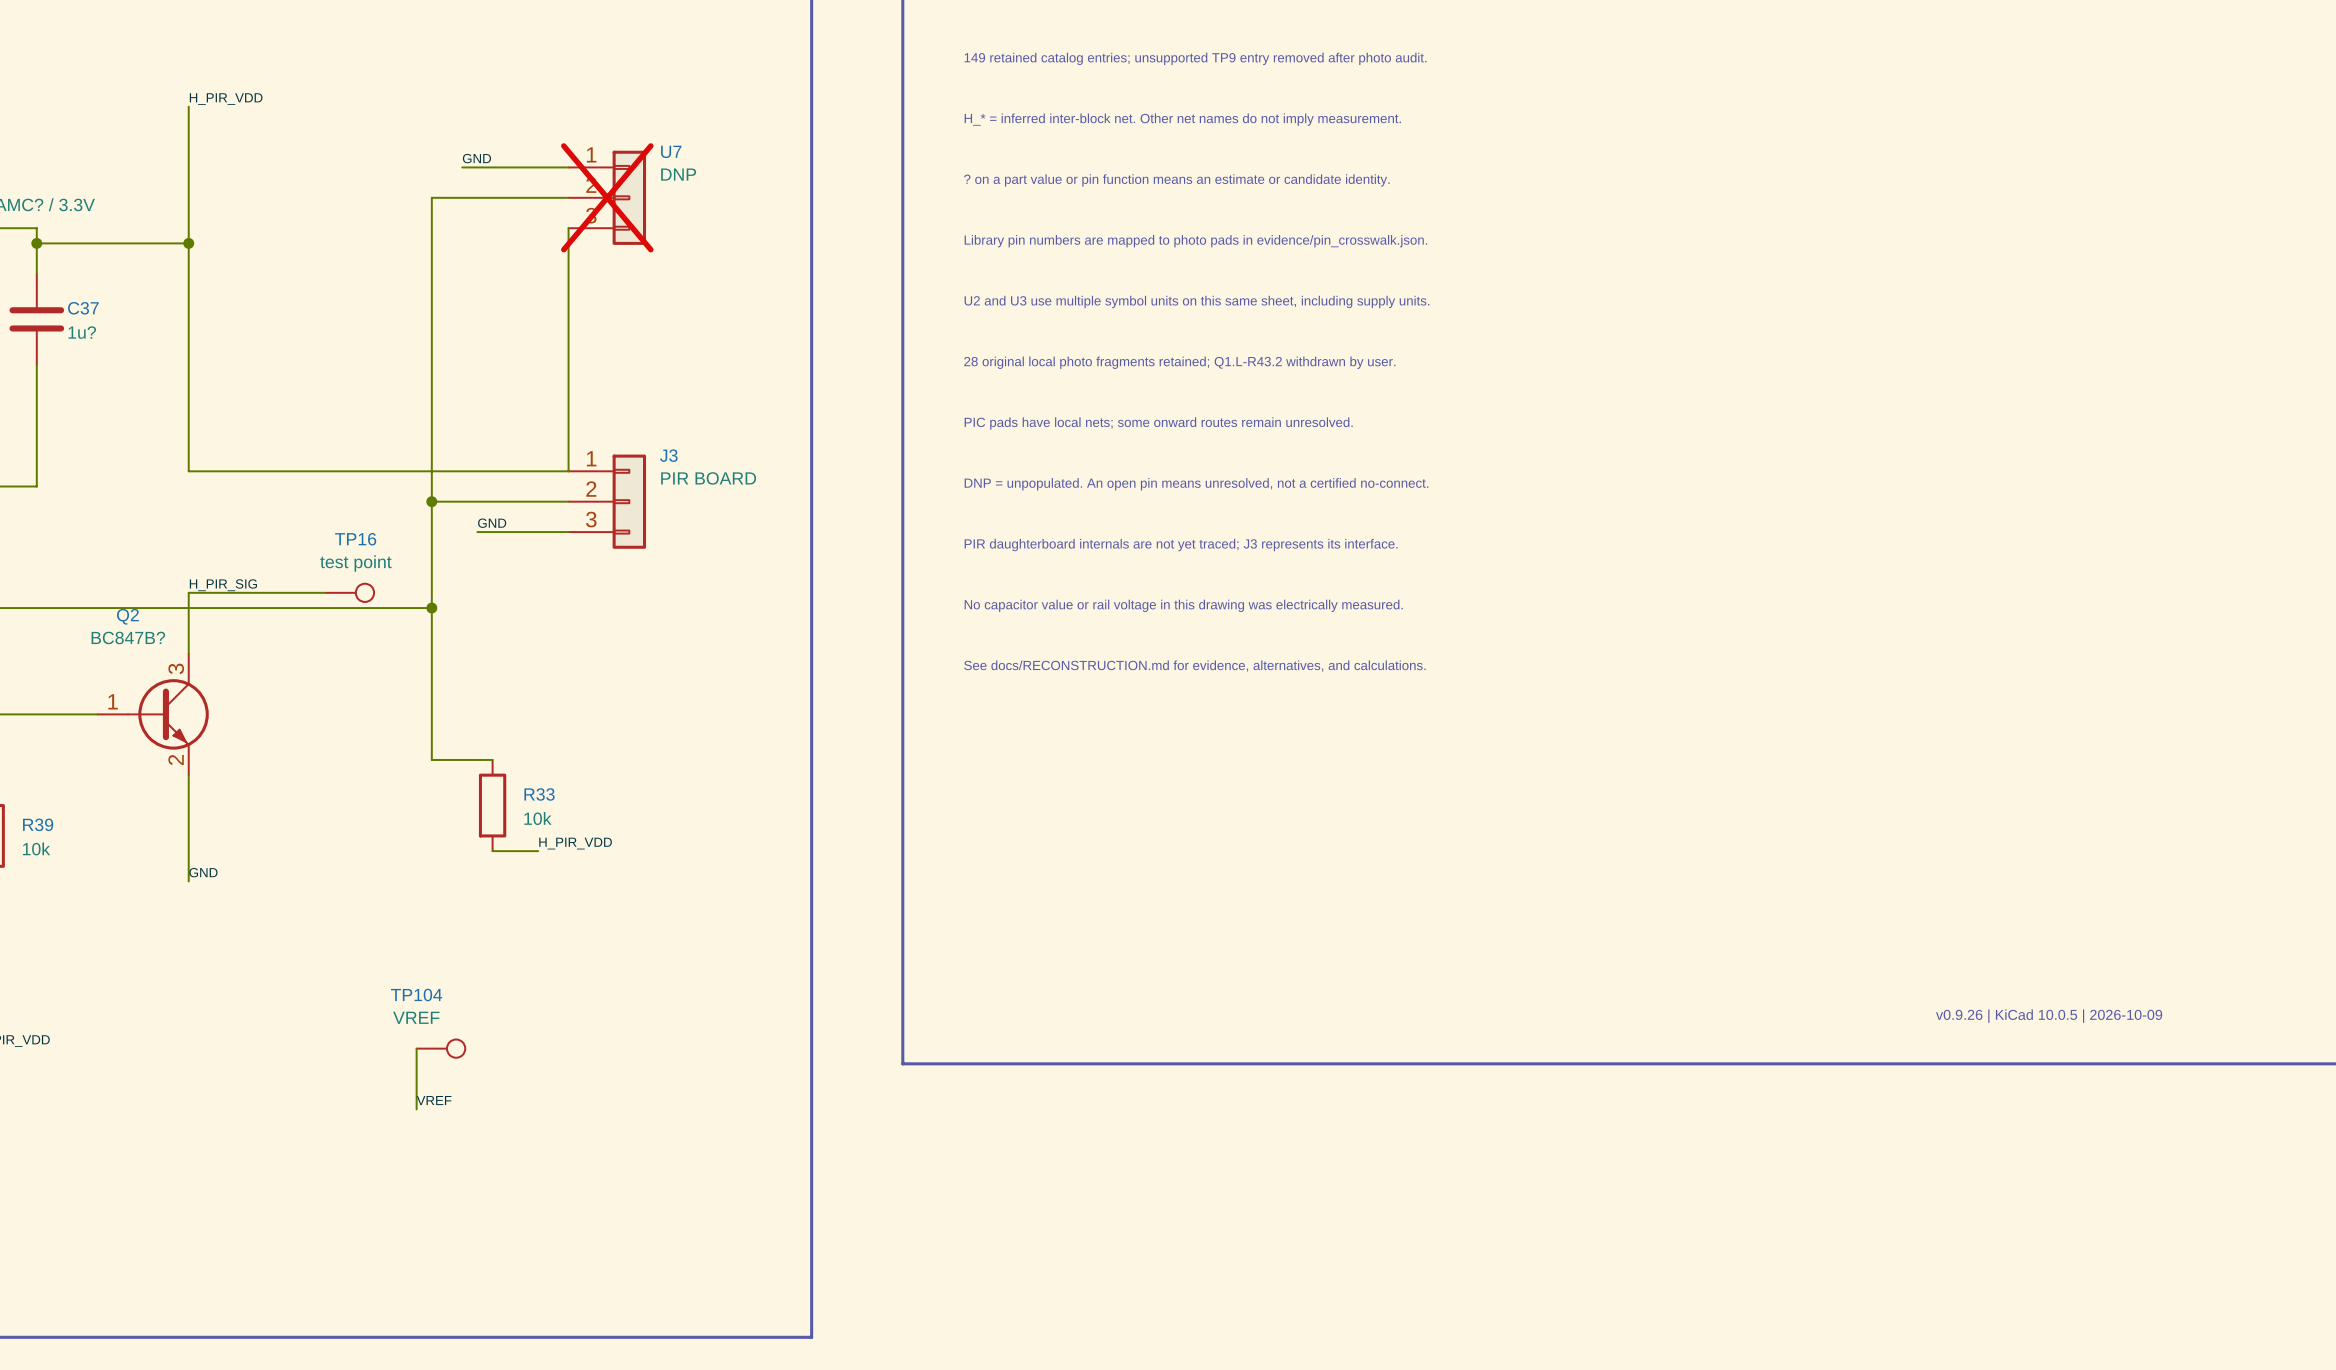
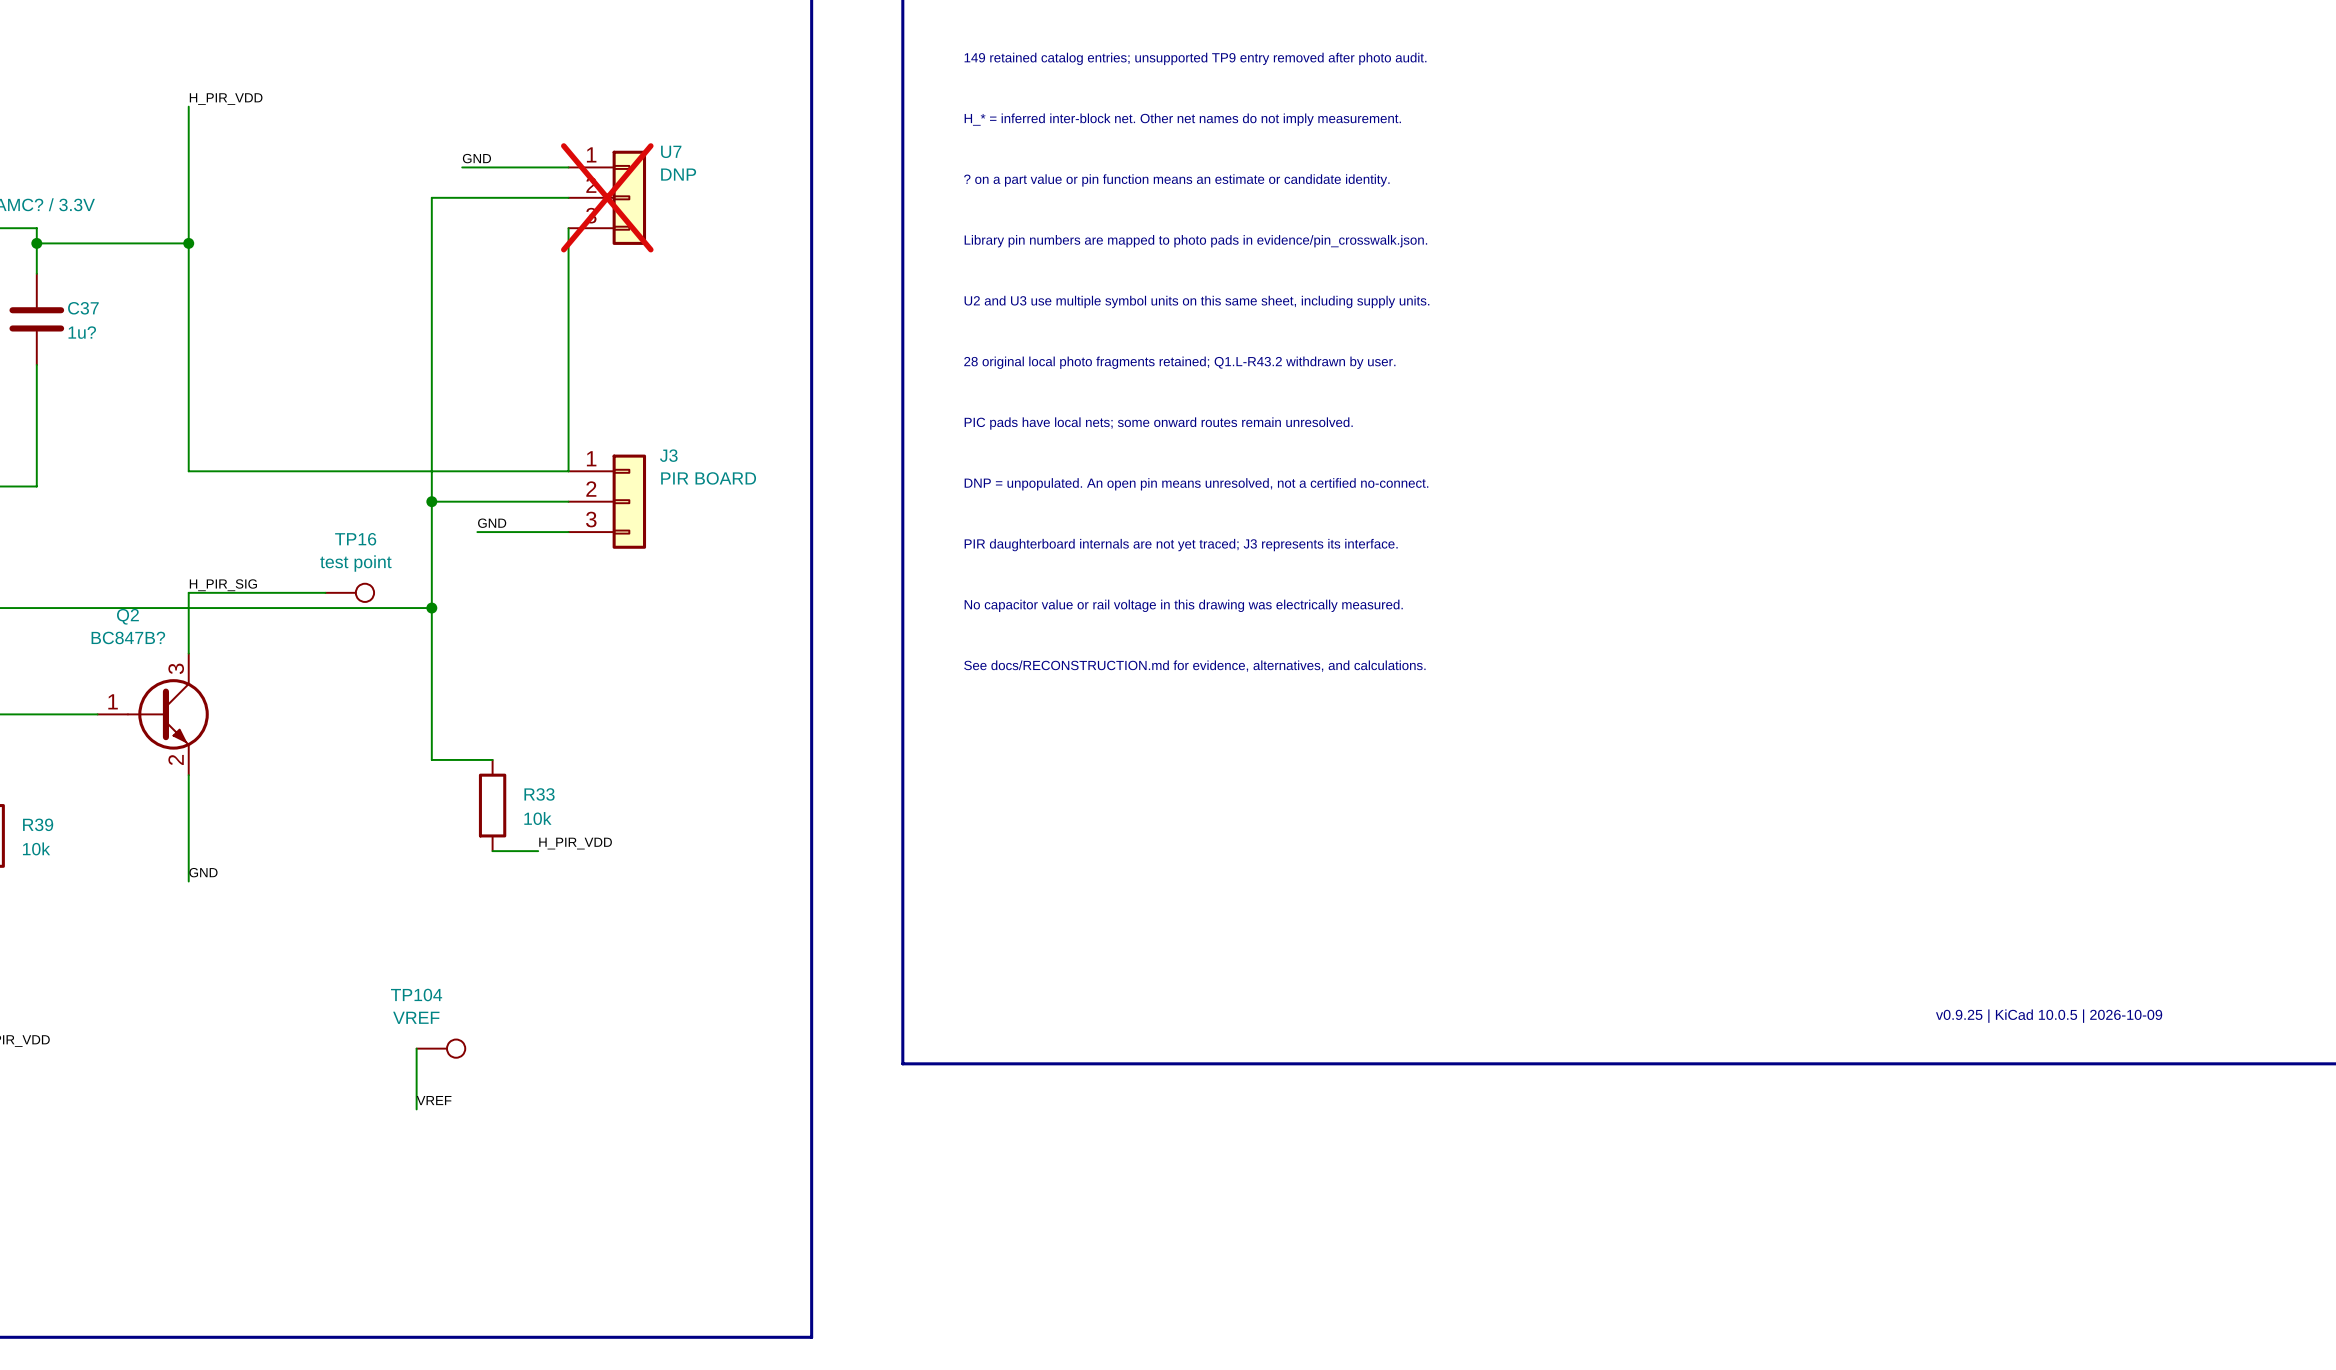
text: v0.9.26 | KiCad 10.0.5 | 2026-10-09 (2049, 1016) -> v0.9.25 | KiCad 10.0.5 | 2026-10-09 (2049, 1016)

